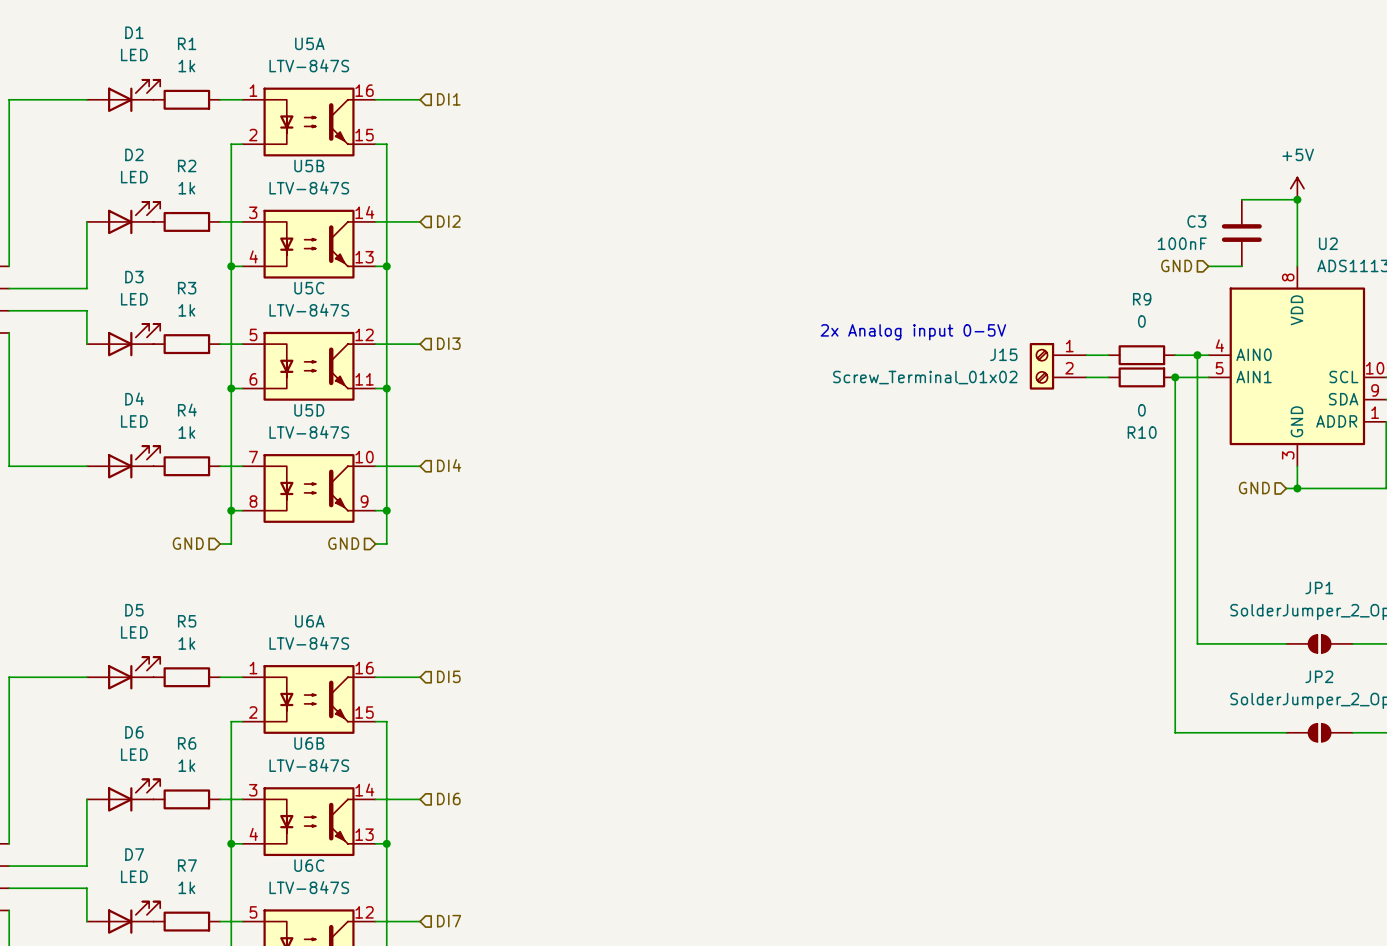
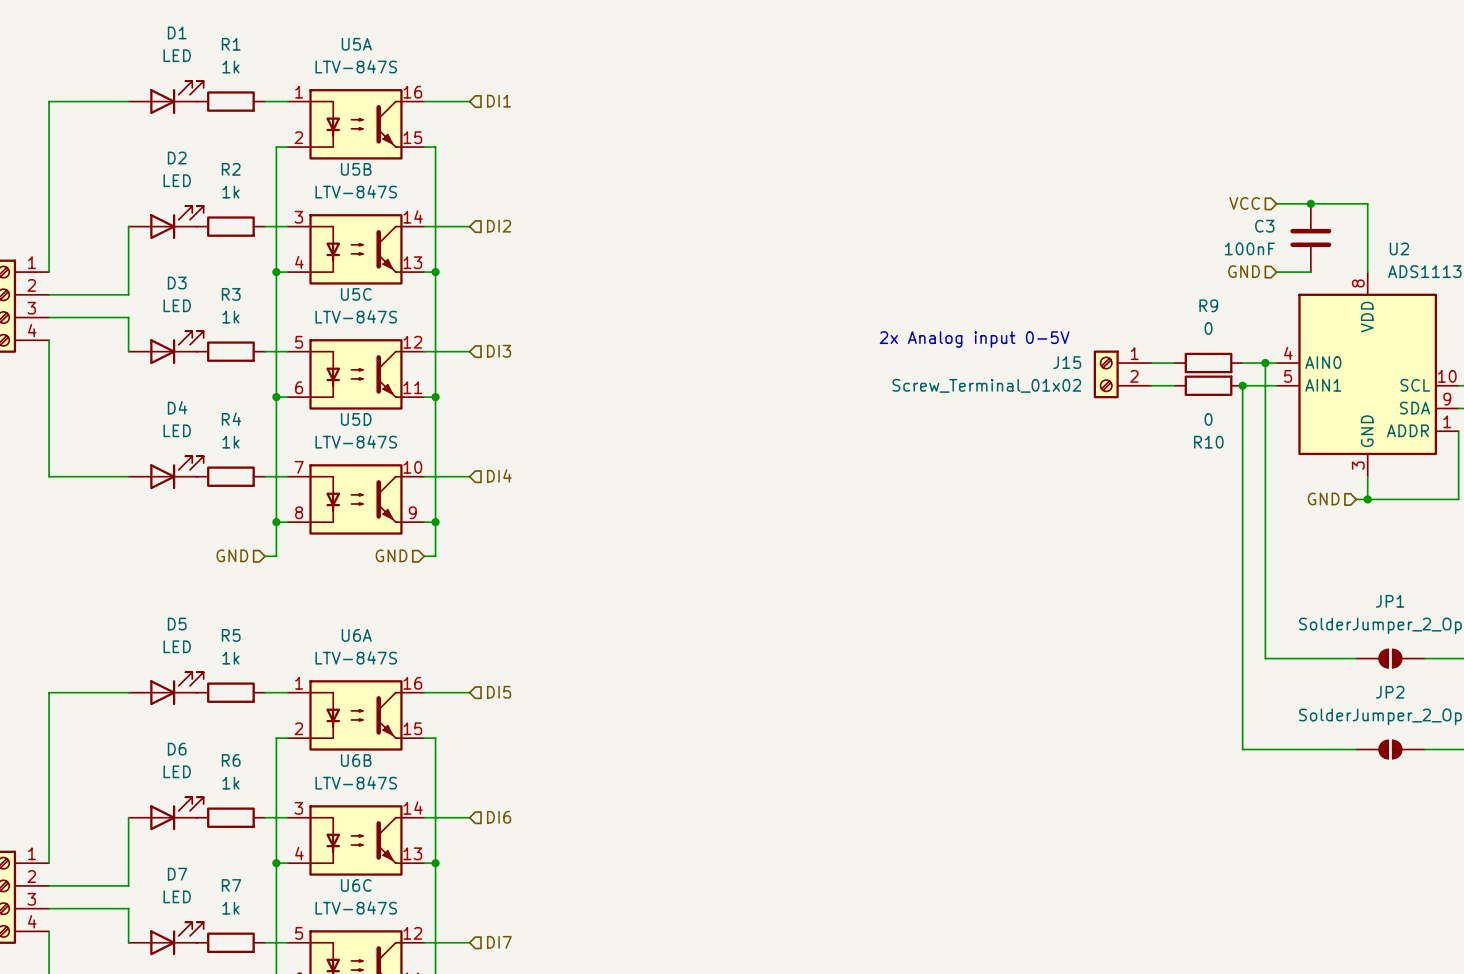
power symbol: +5V (1297, 188) -> none
hierarchical label: none -> VCC (1244, 203)
wire: none -> (1276, 203) (1310, 203)
junction: none -> (1310, 203)
junction: (1297, 199) -> none

